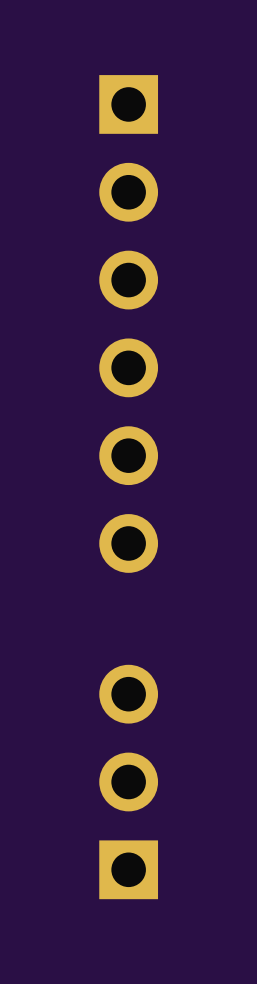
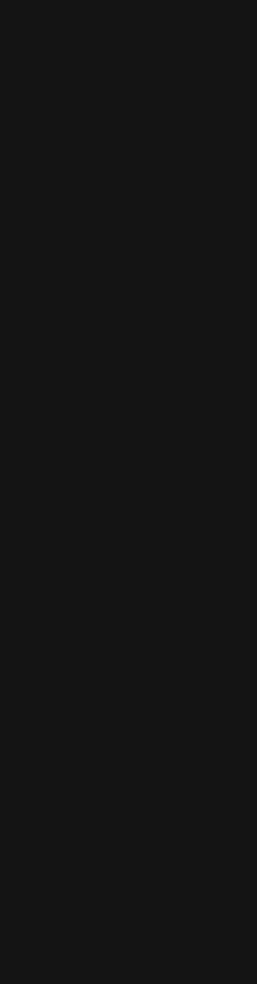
part: (128, 323) -> none
part: (128, 781) -> none

